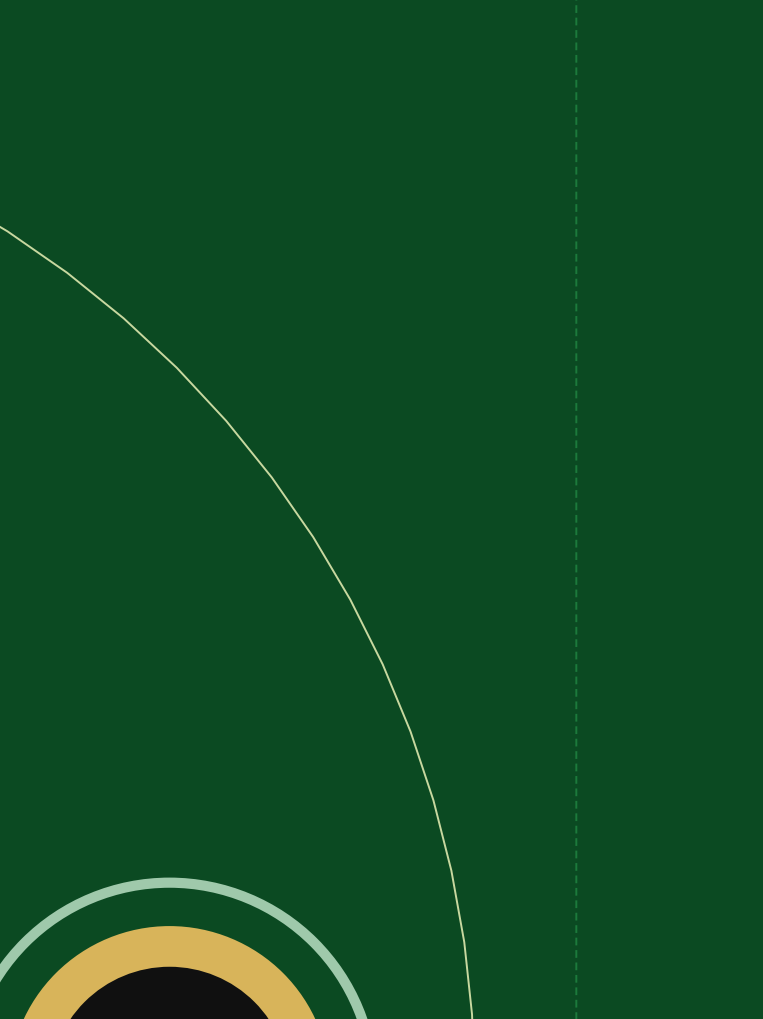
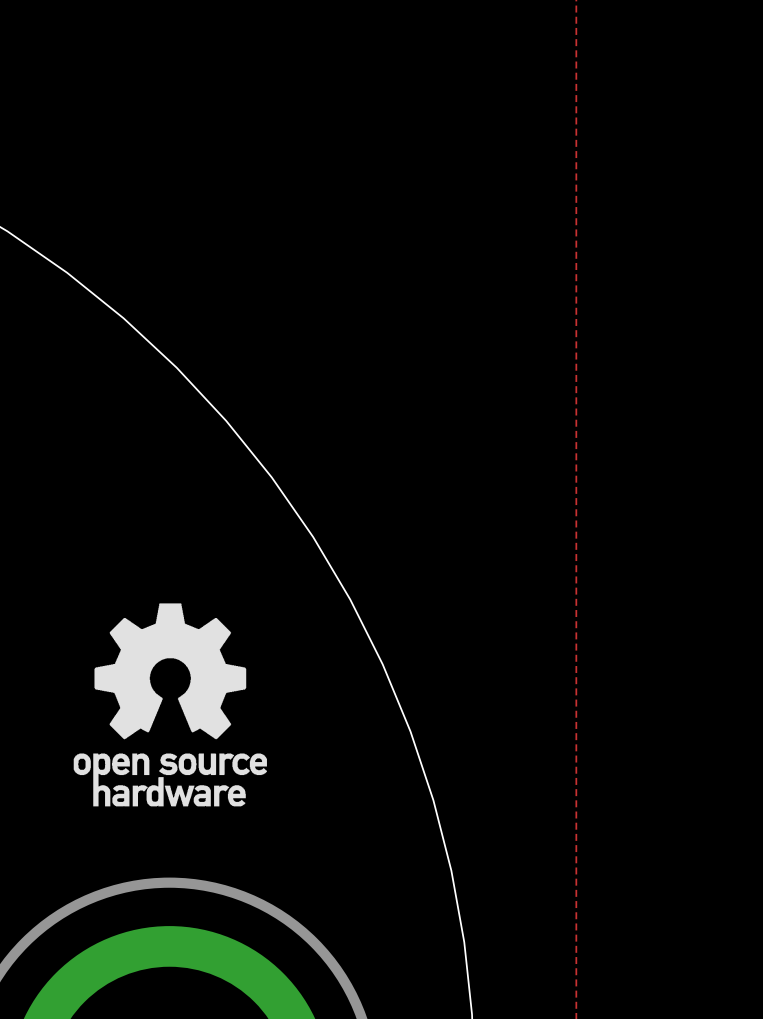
drawing: none -> [73, 603, 267, 807]

